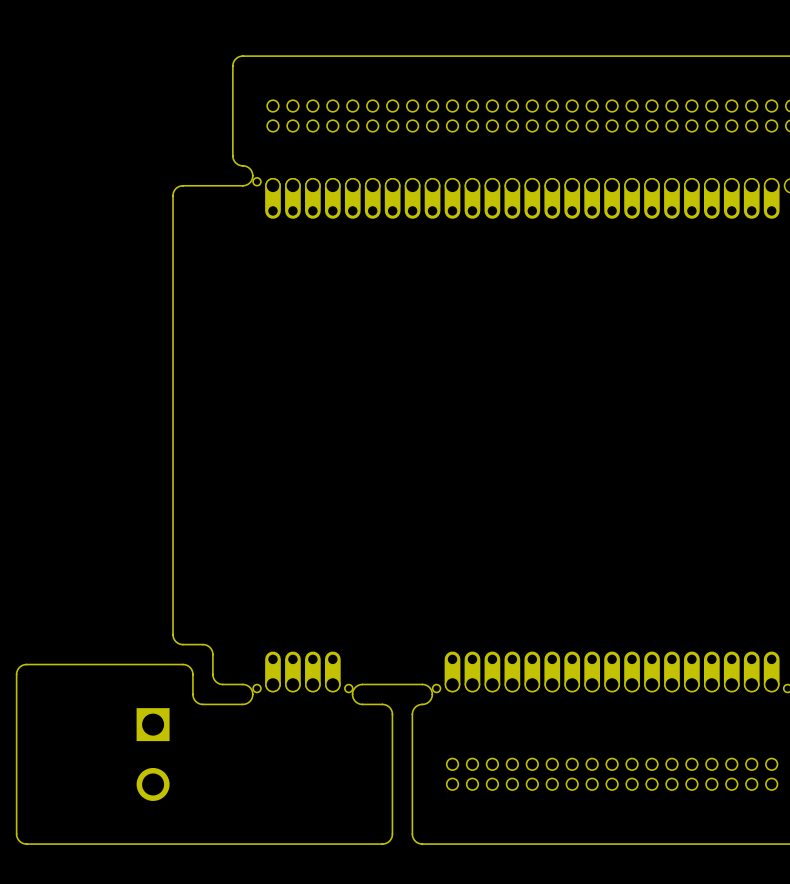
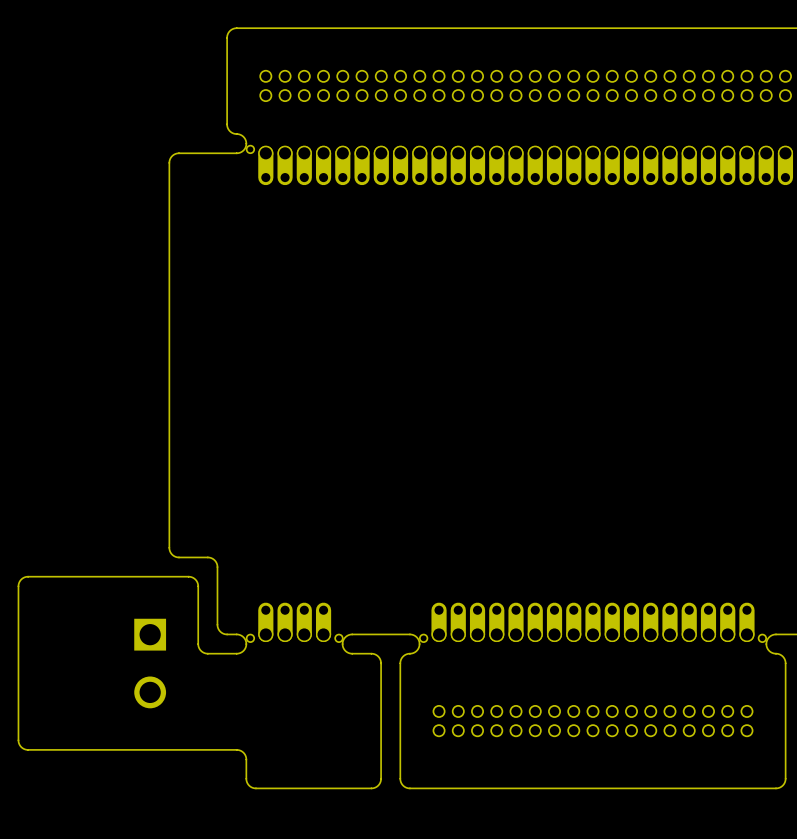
board edge: (173, 594) (174, 639) (180, 644) (204, 644) (209, 646) (212, 653) (214, 679) (220, 684) (232, 684) -> (169, 547) (170, 552) (175, 556) (208, 557) (216, 561) (217, 625) (220, 631) (227, 634)
board edge: (16, 674) (19, 667) (25, 664) (184, 664) (189, 666) (192, 671) (193, 695) (195, 700) (200, 704) (212, 704) -> (18, 624) (18, 585) (21, 579) (25, 576) (189, 576) (195, 579) (198, 585) (198, 646) (201, 651) (207, 653)
part position: (153, 754) -> (150, 663)
board edge: (16, 794) (16, 835) (19, 841) (24, 843) (262, 844) -> (18, 740) (21, 747) (28, 749) (238, 750) (246, 757) (247, 782) (255, 788)

